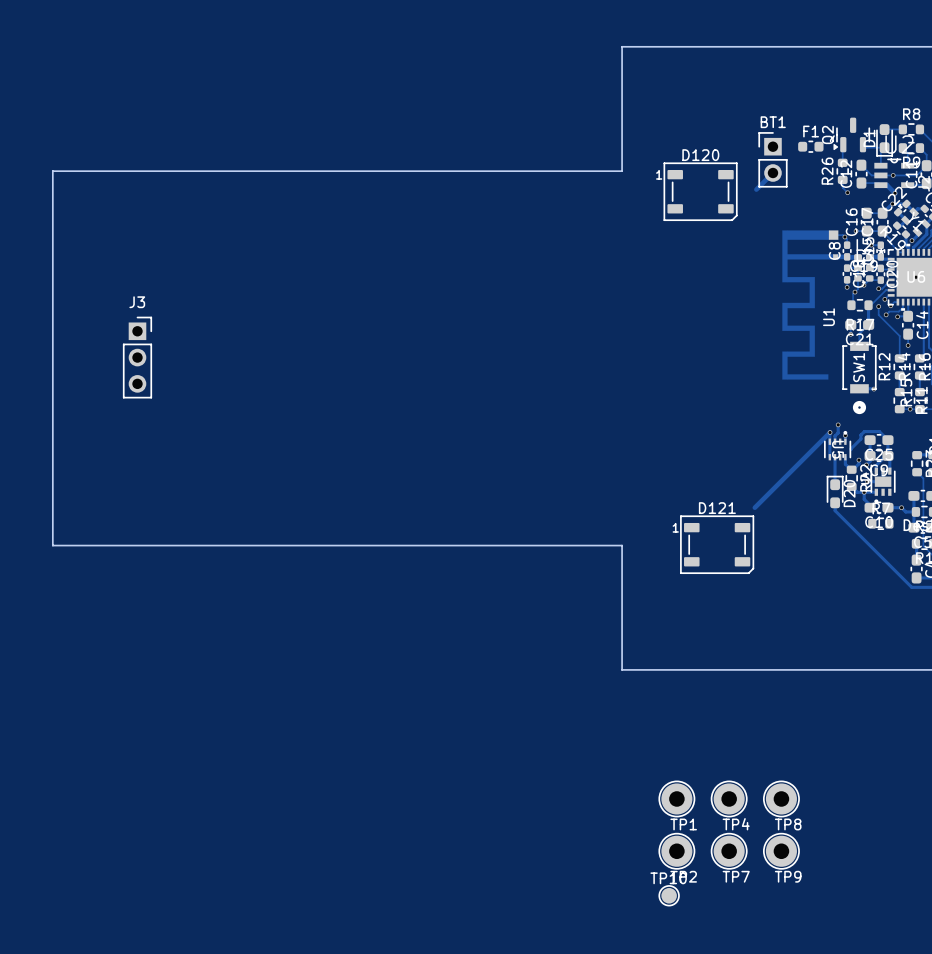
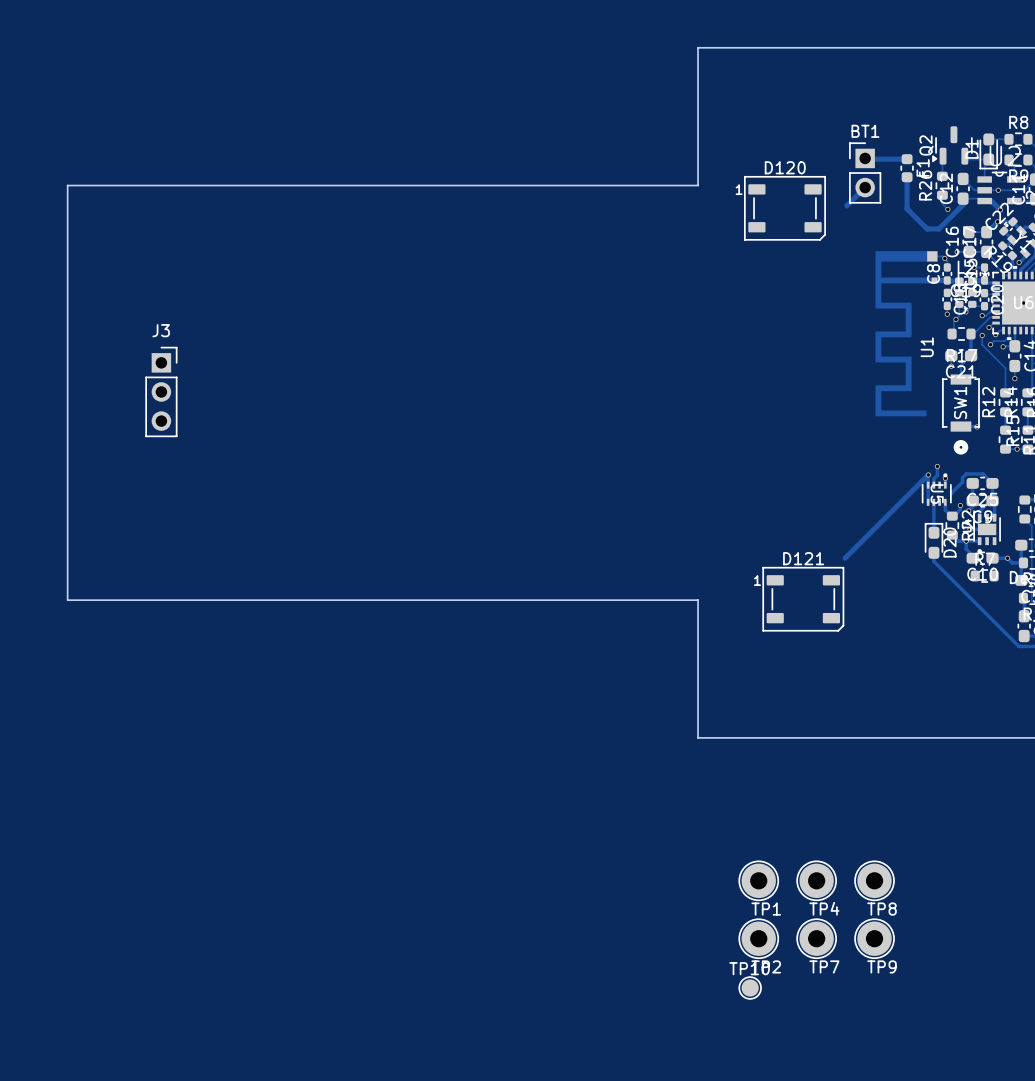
track: none -> (865, 158) (907, 159)
F1 rotation: 0° (810, 146) -> 90° clockwise (907, 168)
track: none -> (907, 177) (907, 208) (927, 228) (938, 228) (963, 204) (963, 198)

